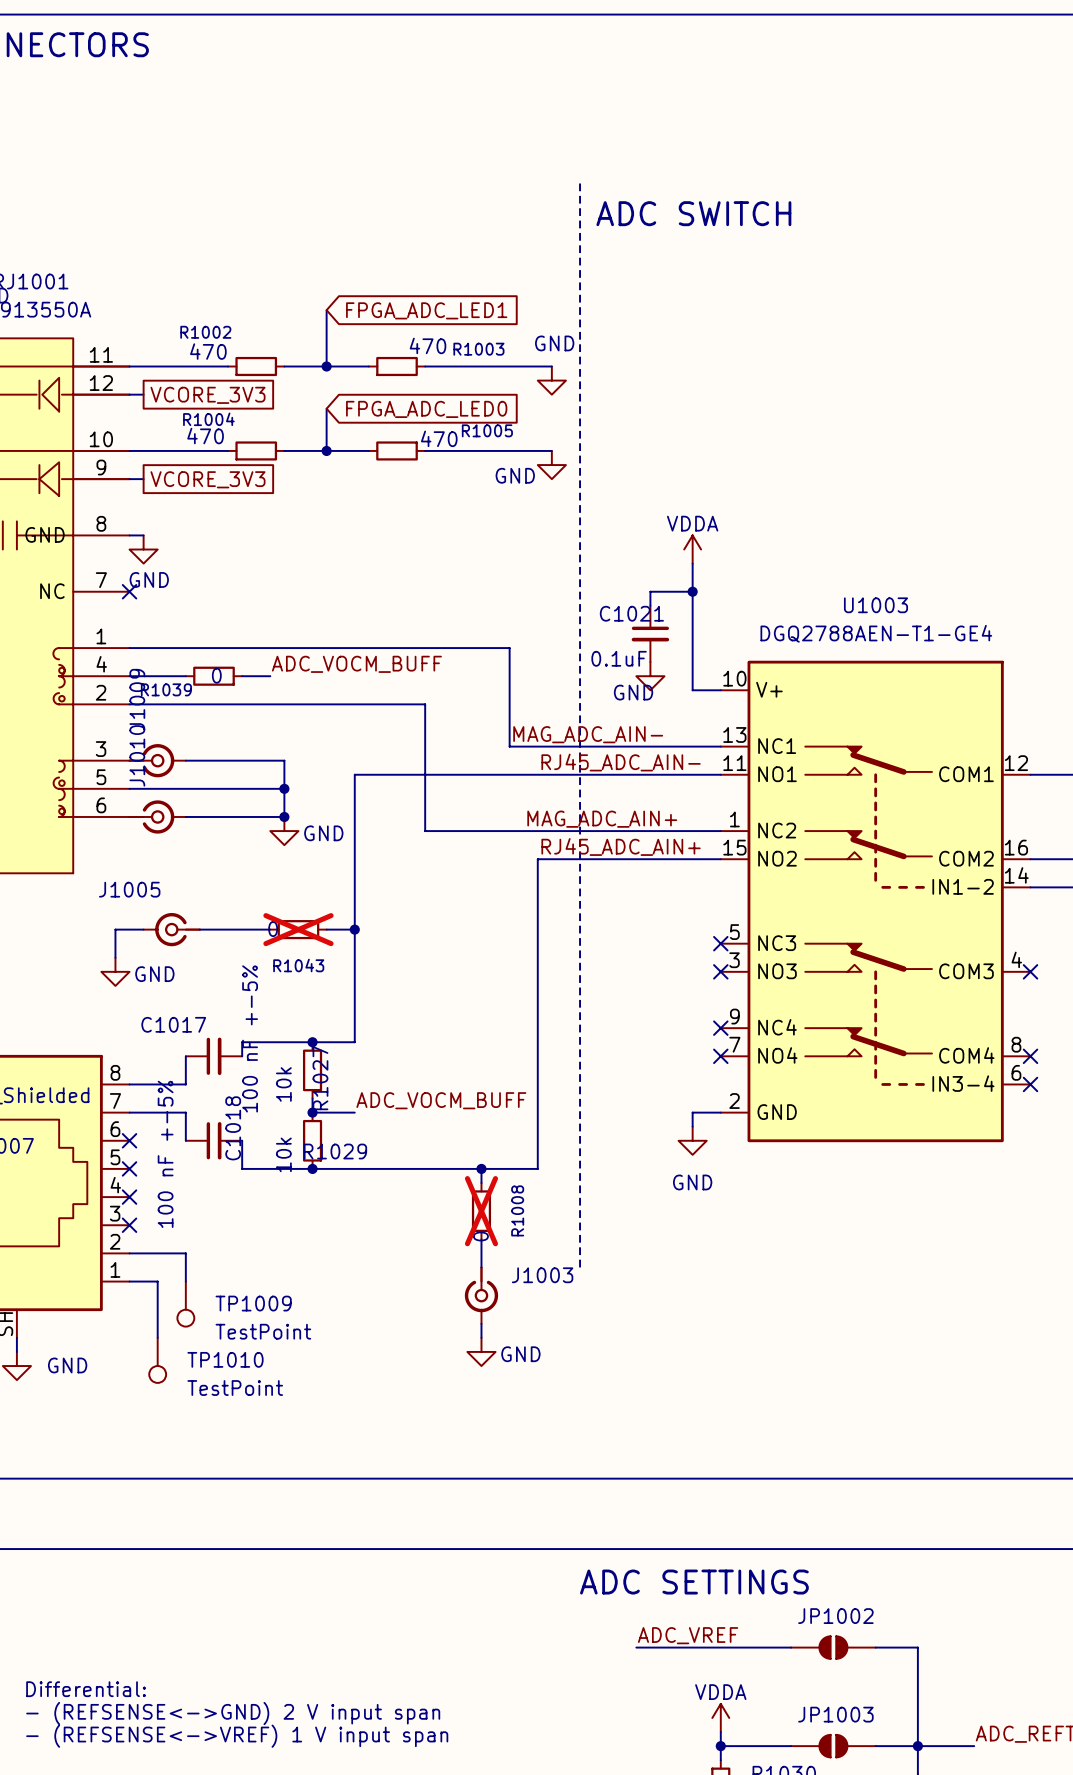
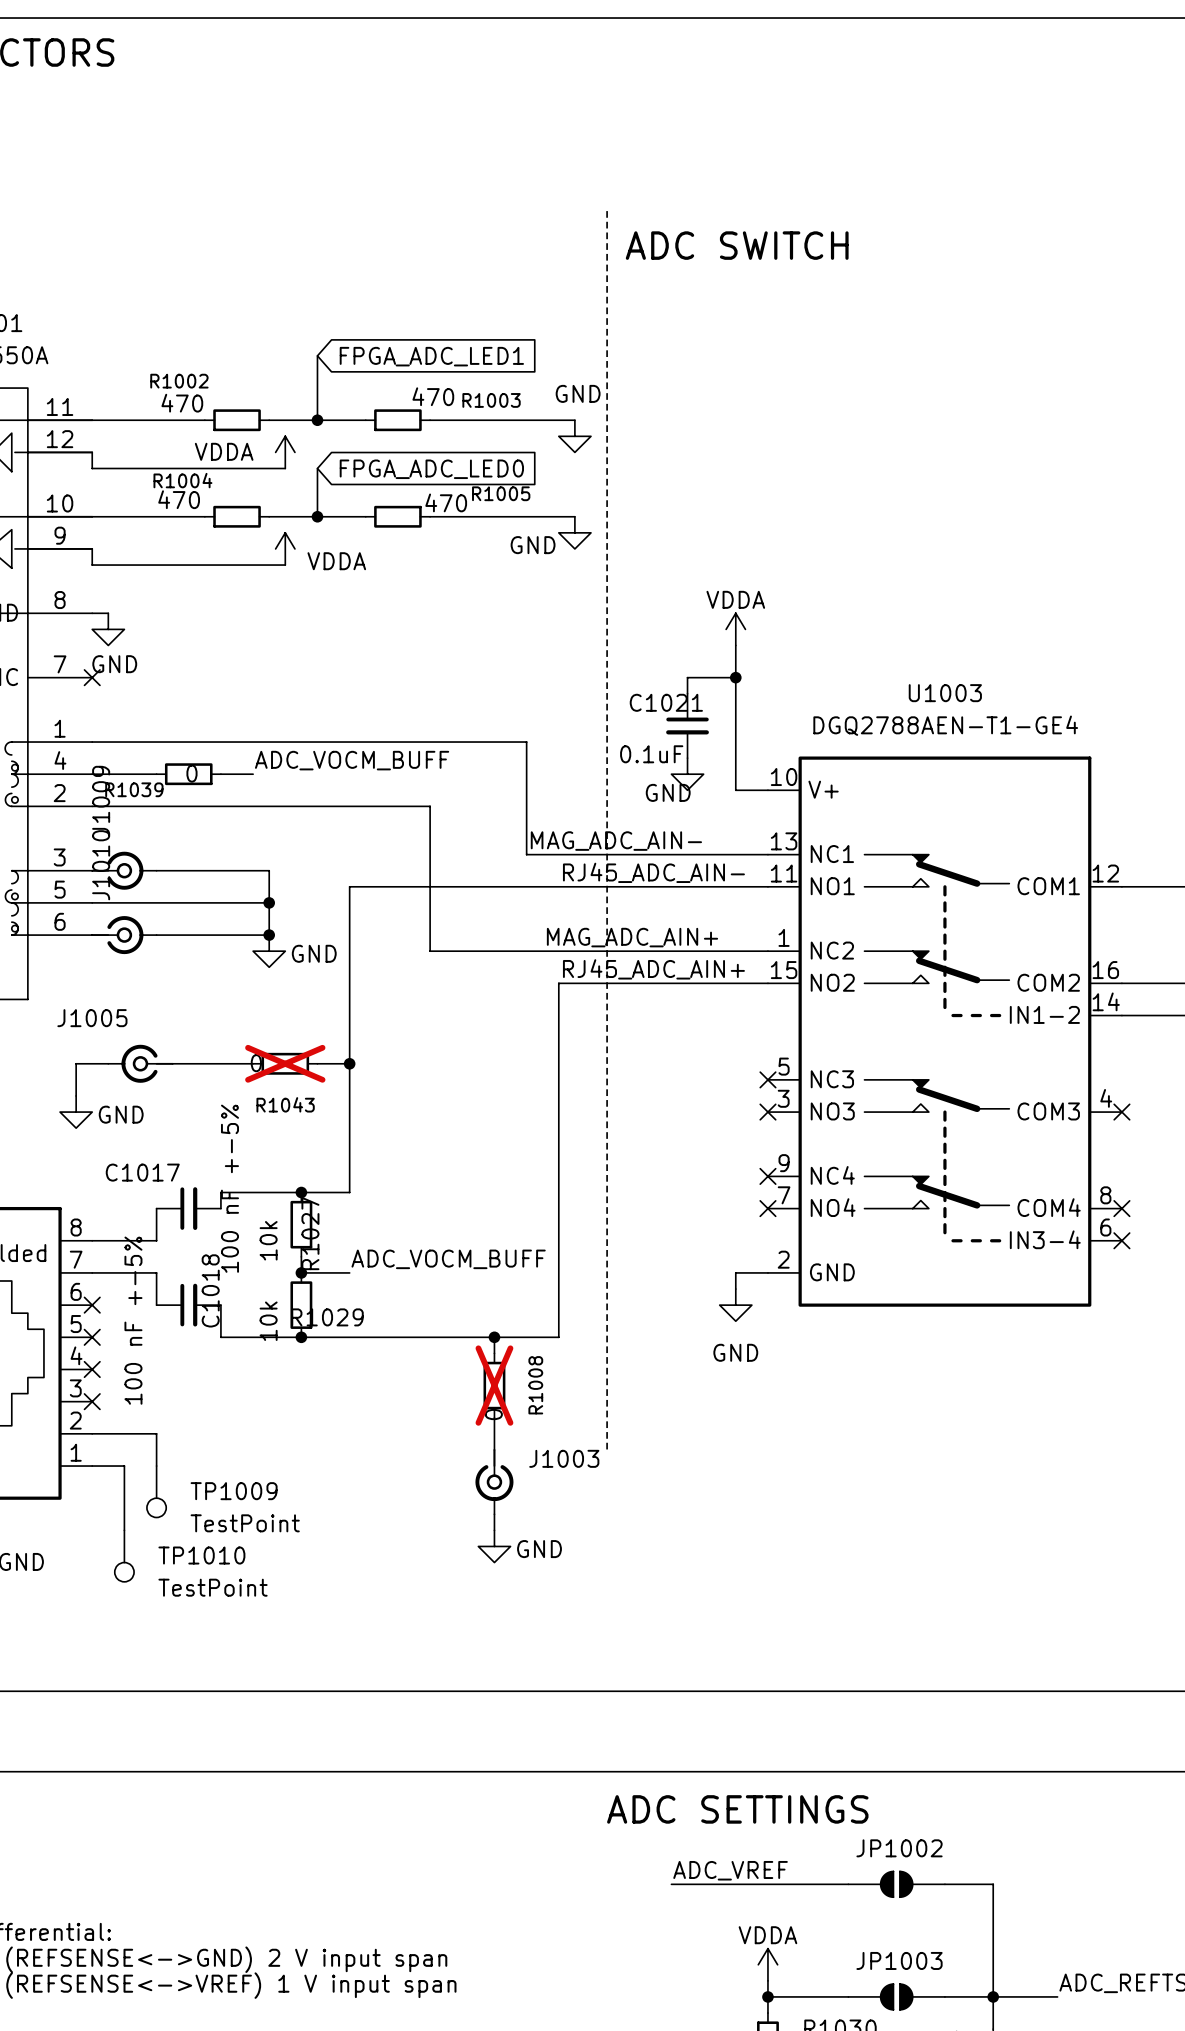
wire: (129, 394) (143, 394) -> (92, 452) (92, 468) (285, 468)
power symbol: none -> VDDA (285, 452)
global label: VCORE_3V3 (207, 395) -> none
wire: (129, 479) (143, 479) -> (92, 548) (92, 565) (285, 565)
global label: VCORE_3V3 (207, 479) -> none
power symbol: none -> VDDA (285, 548)

